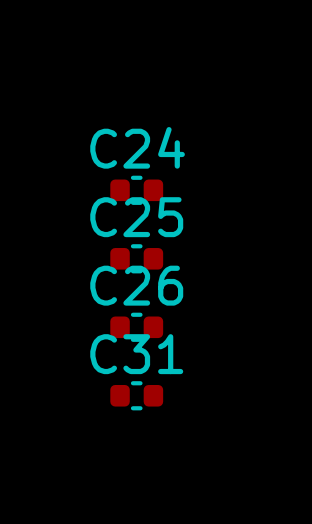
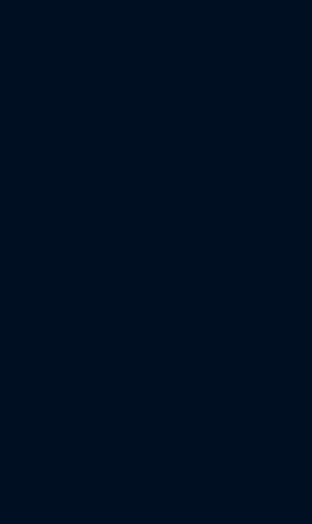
C24: (136, 190) -> none
C25: (136, 258) -> none
C26: (136, 327) -> none
C31: (136, 395) -> none

